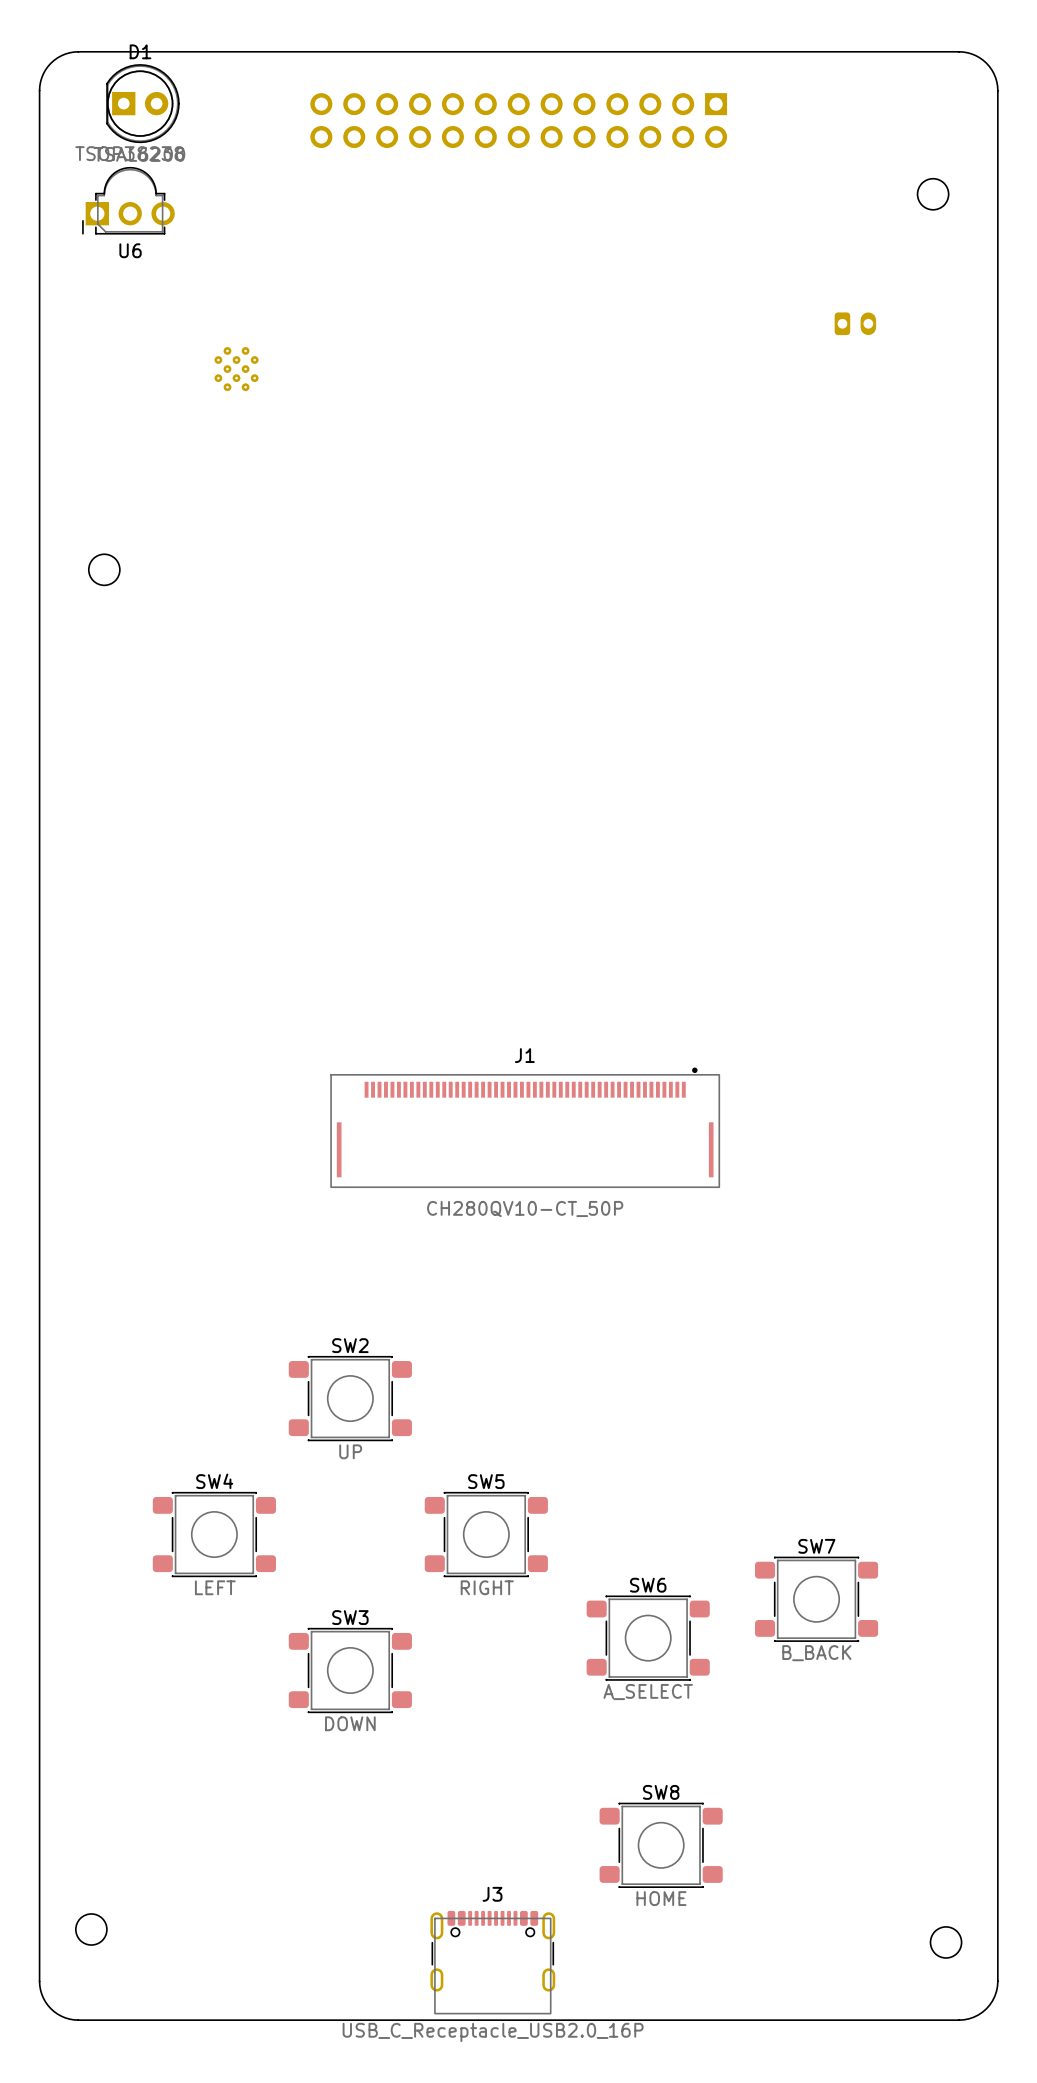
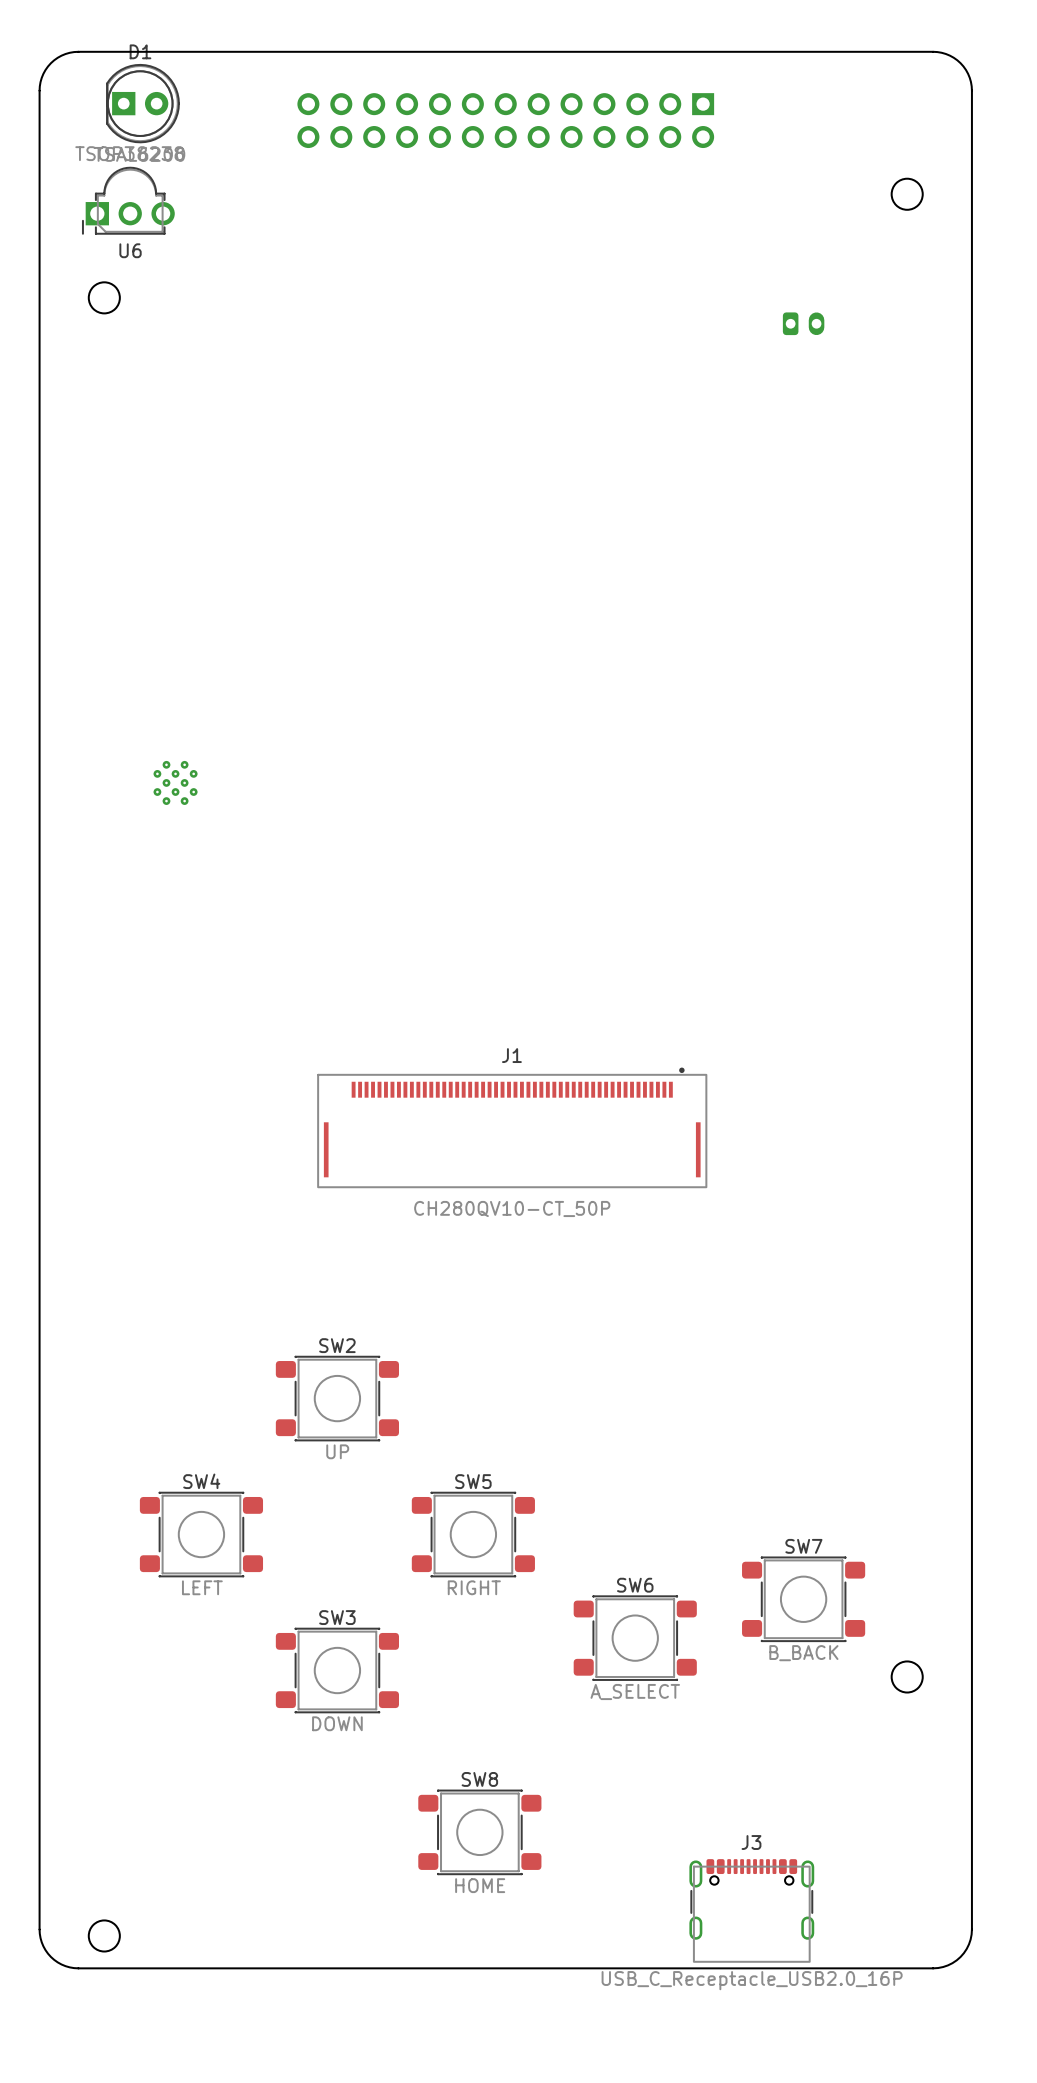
board edge: (933, 51) (963, 52) (979, 57) (991, 69) (997, 90) (997, 1981) (994, 1996) (986, 2008) (978, 2014) (958, 2020) (74, 2019) (54, 2011) (41, 1994) (39, 1981) (39, 1929) -> (933, 51) (949, 55) (960, 63) (968, 73) (971, 90) (971, 1929) (968, 1944) (956, 1960) (947, 1965) (933, 1968) (78, 1968) (61, 1964) (50, 1956) (43, 1946) (39, 1929)
part position: (518, 120) -> (505, 120)
round board edge position: (933, 194) -> (907, 194)
part position: (855, 323) -> (803, 323)
part: (236, 369) -> none
round board edge position: (104, 569) -> (104, 297)
part: none -> (175, 782)
J1 position: (525, 1127) -> (512, 1127)
SW2 position: (350, 1398) -> (337, 1398)
SW4 position: (214, 1534) -> (201, 1534)
SW5 position: (486, 1534) -> (473, 1534)
SW7 position: (816, 1599) -> (803, 1599)
SW6 position: (648, 1638) -> (635, 1638)
SW3 position: (350, 1670) -> (337, 1670)
SW8 position: (661, 1845) -> (479, 1832)
round board edge position: (91, 1929) -> (104, 1935)
round board edge position: (946, 1942) -> (907, 1676)
J3 position: (492, 1962) -> (751, 1910)

